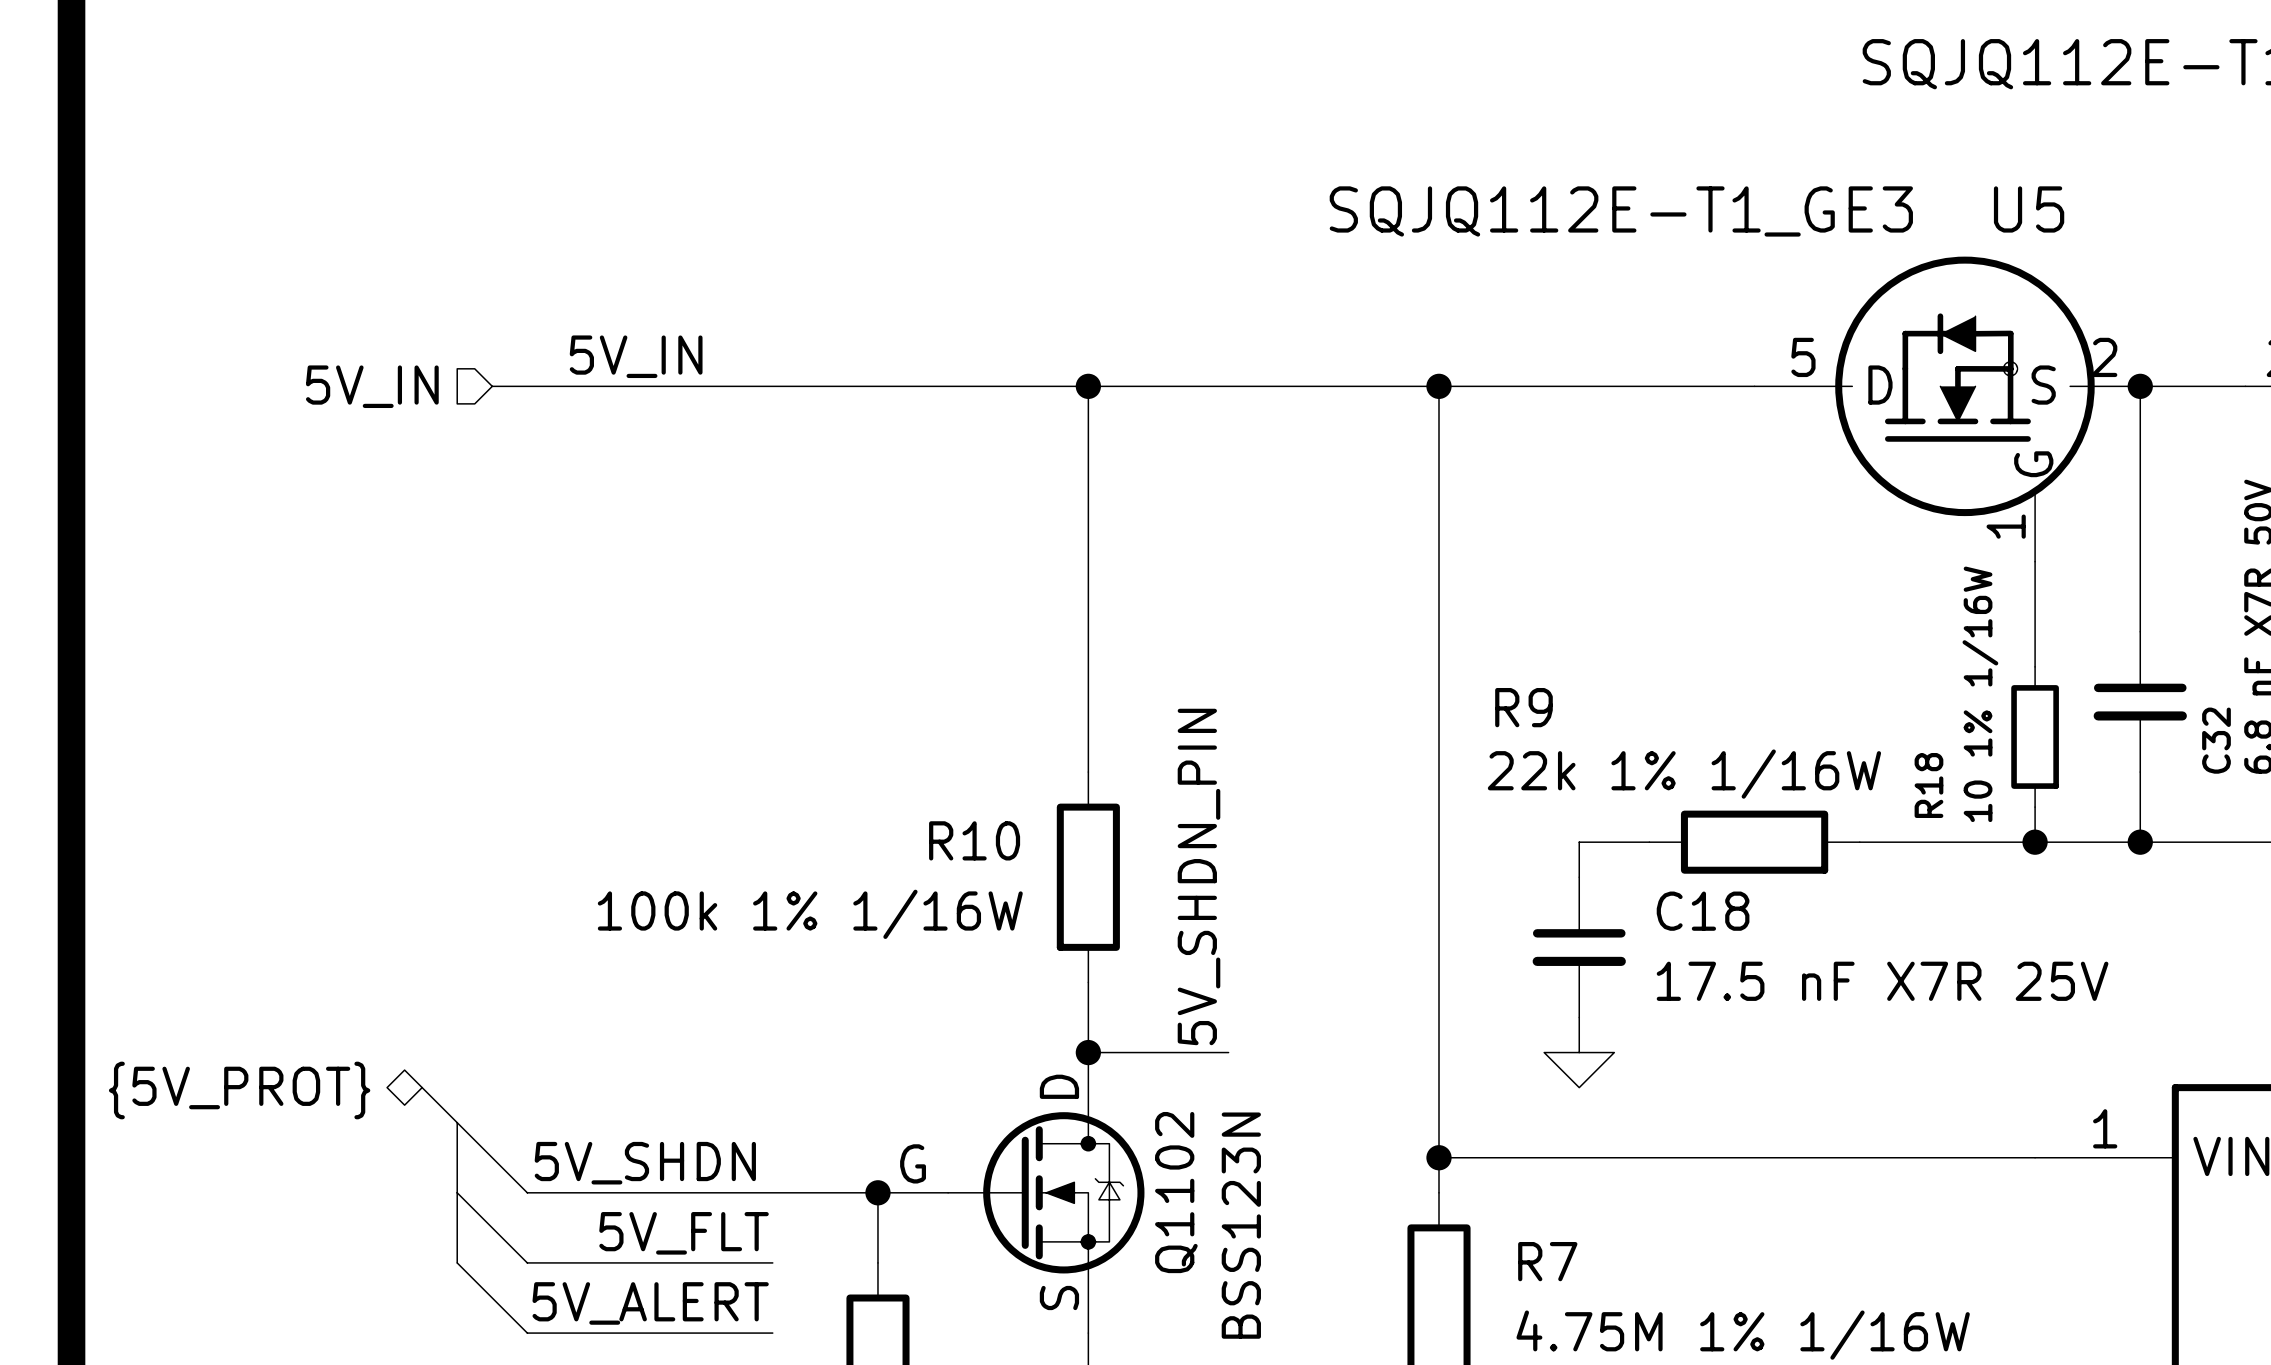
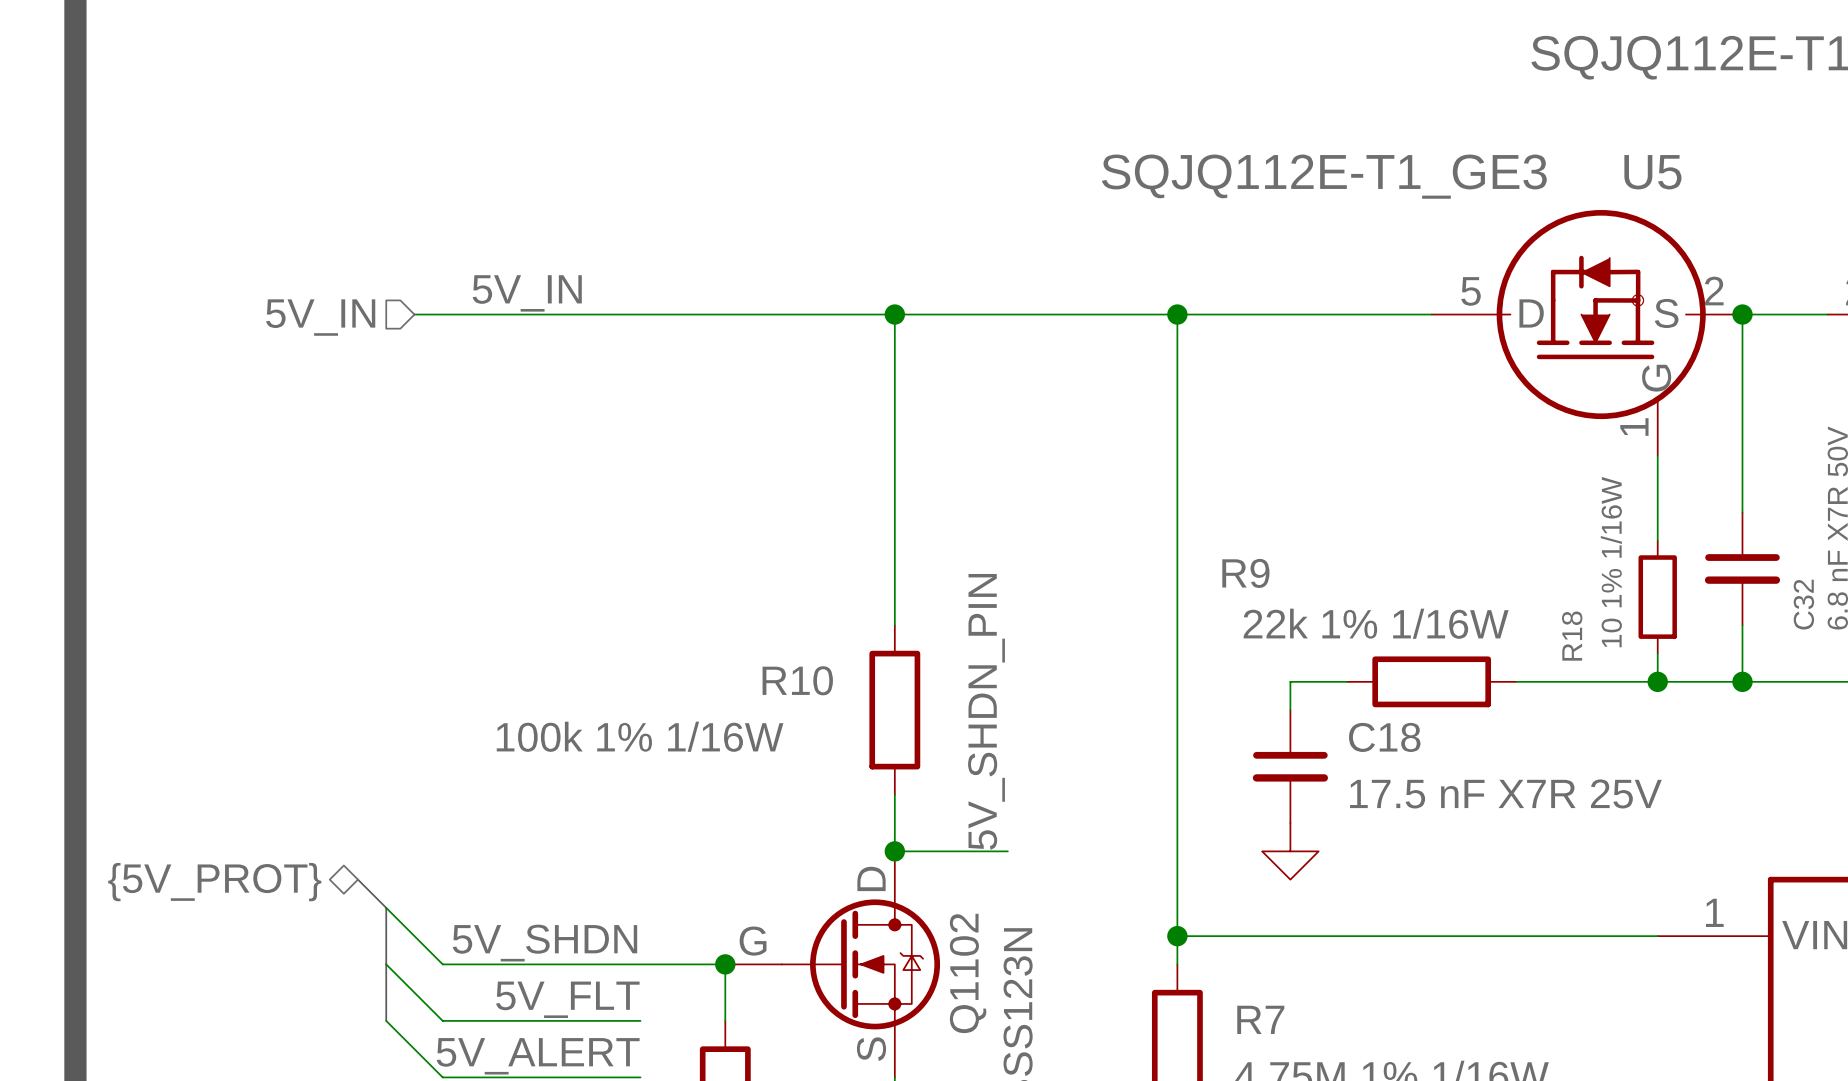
label position: 5V_SHDN (645, 1163) -> 5V_SHDN (544, 943)

